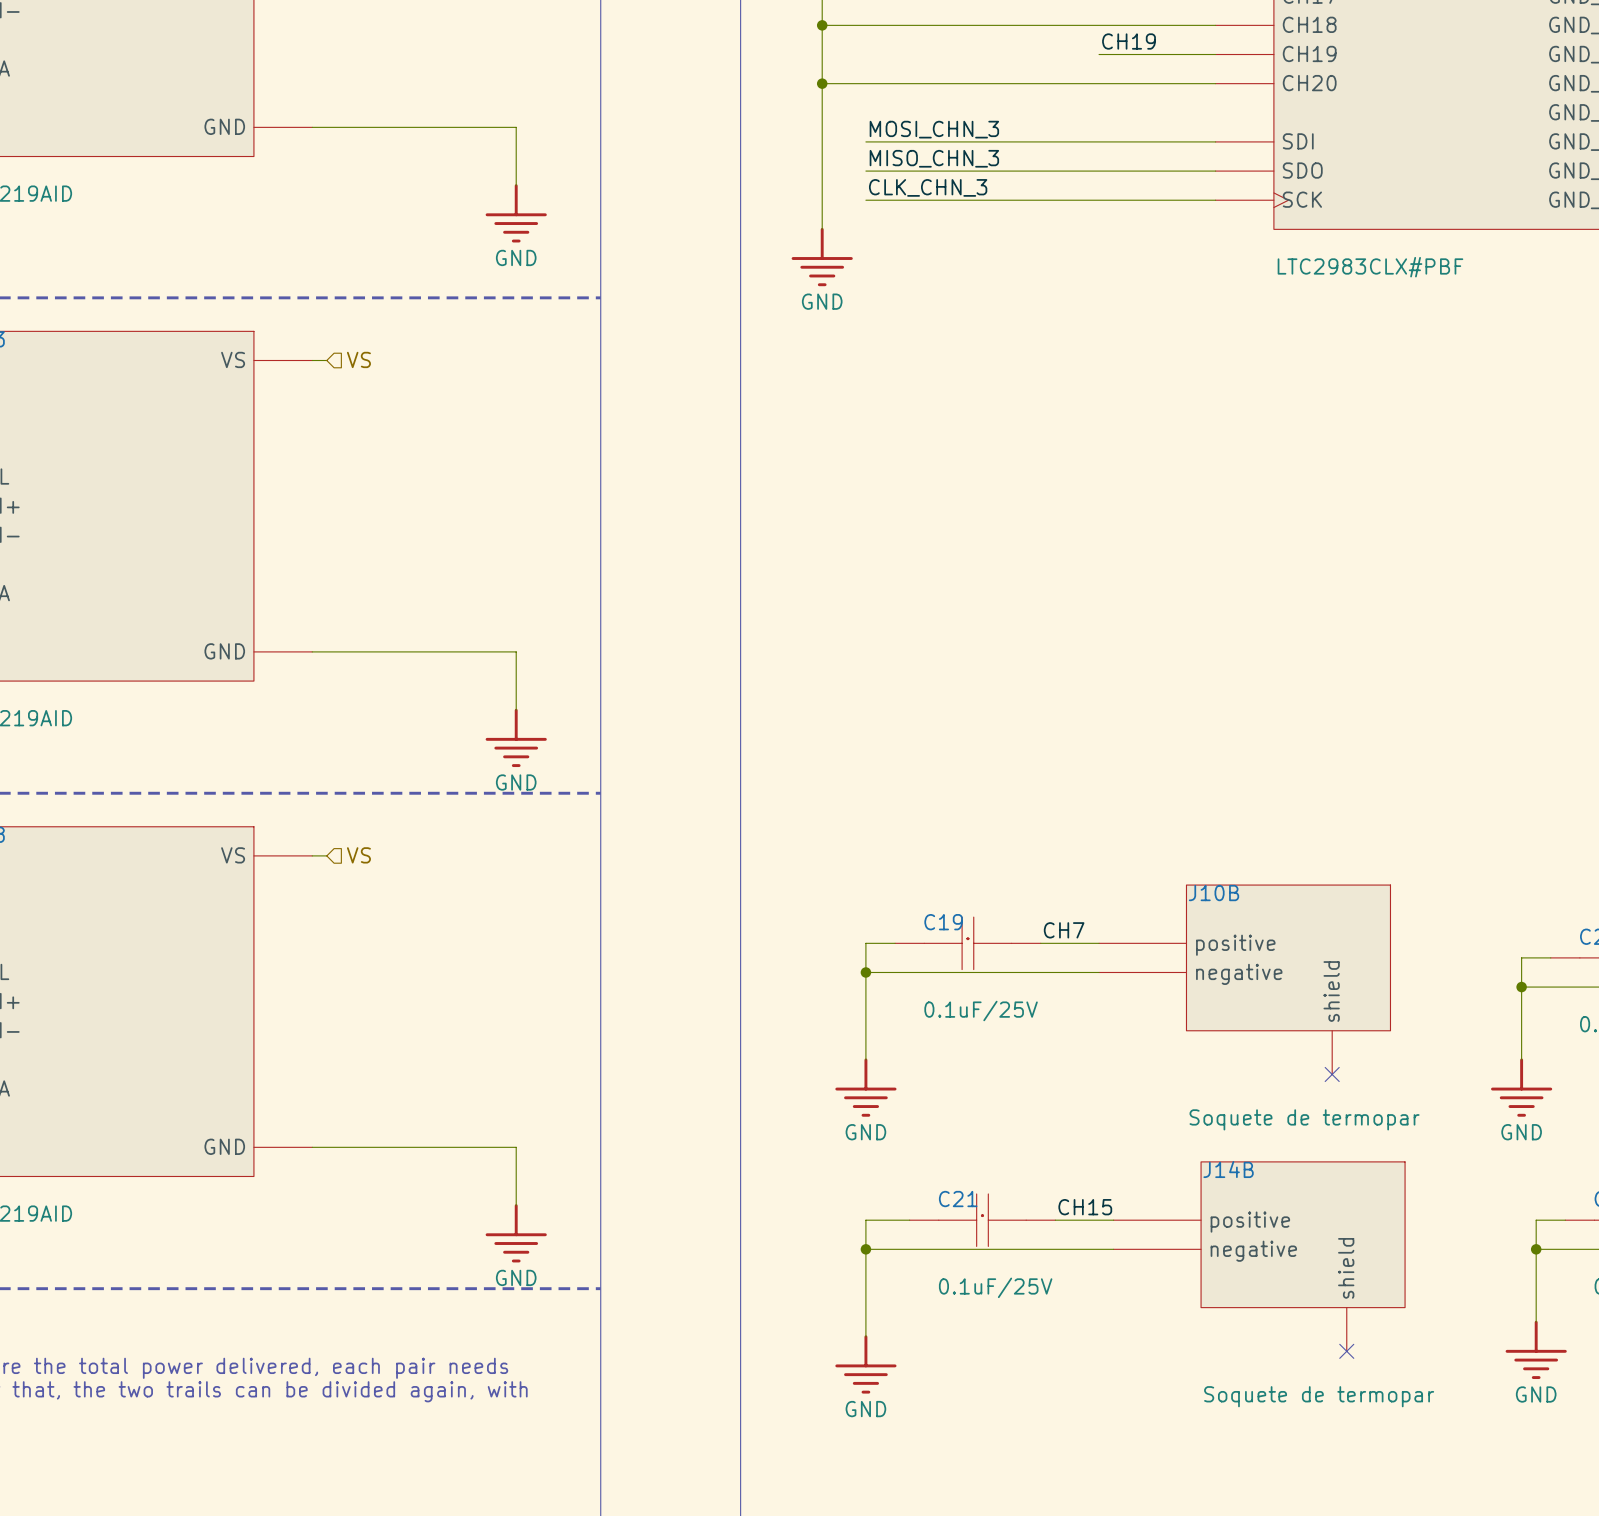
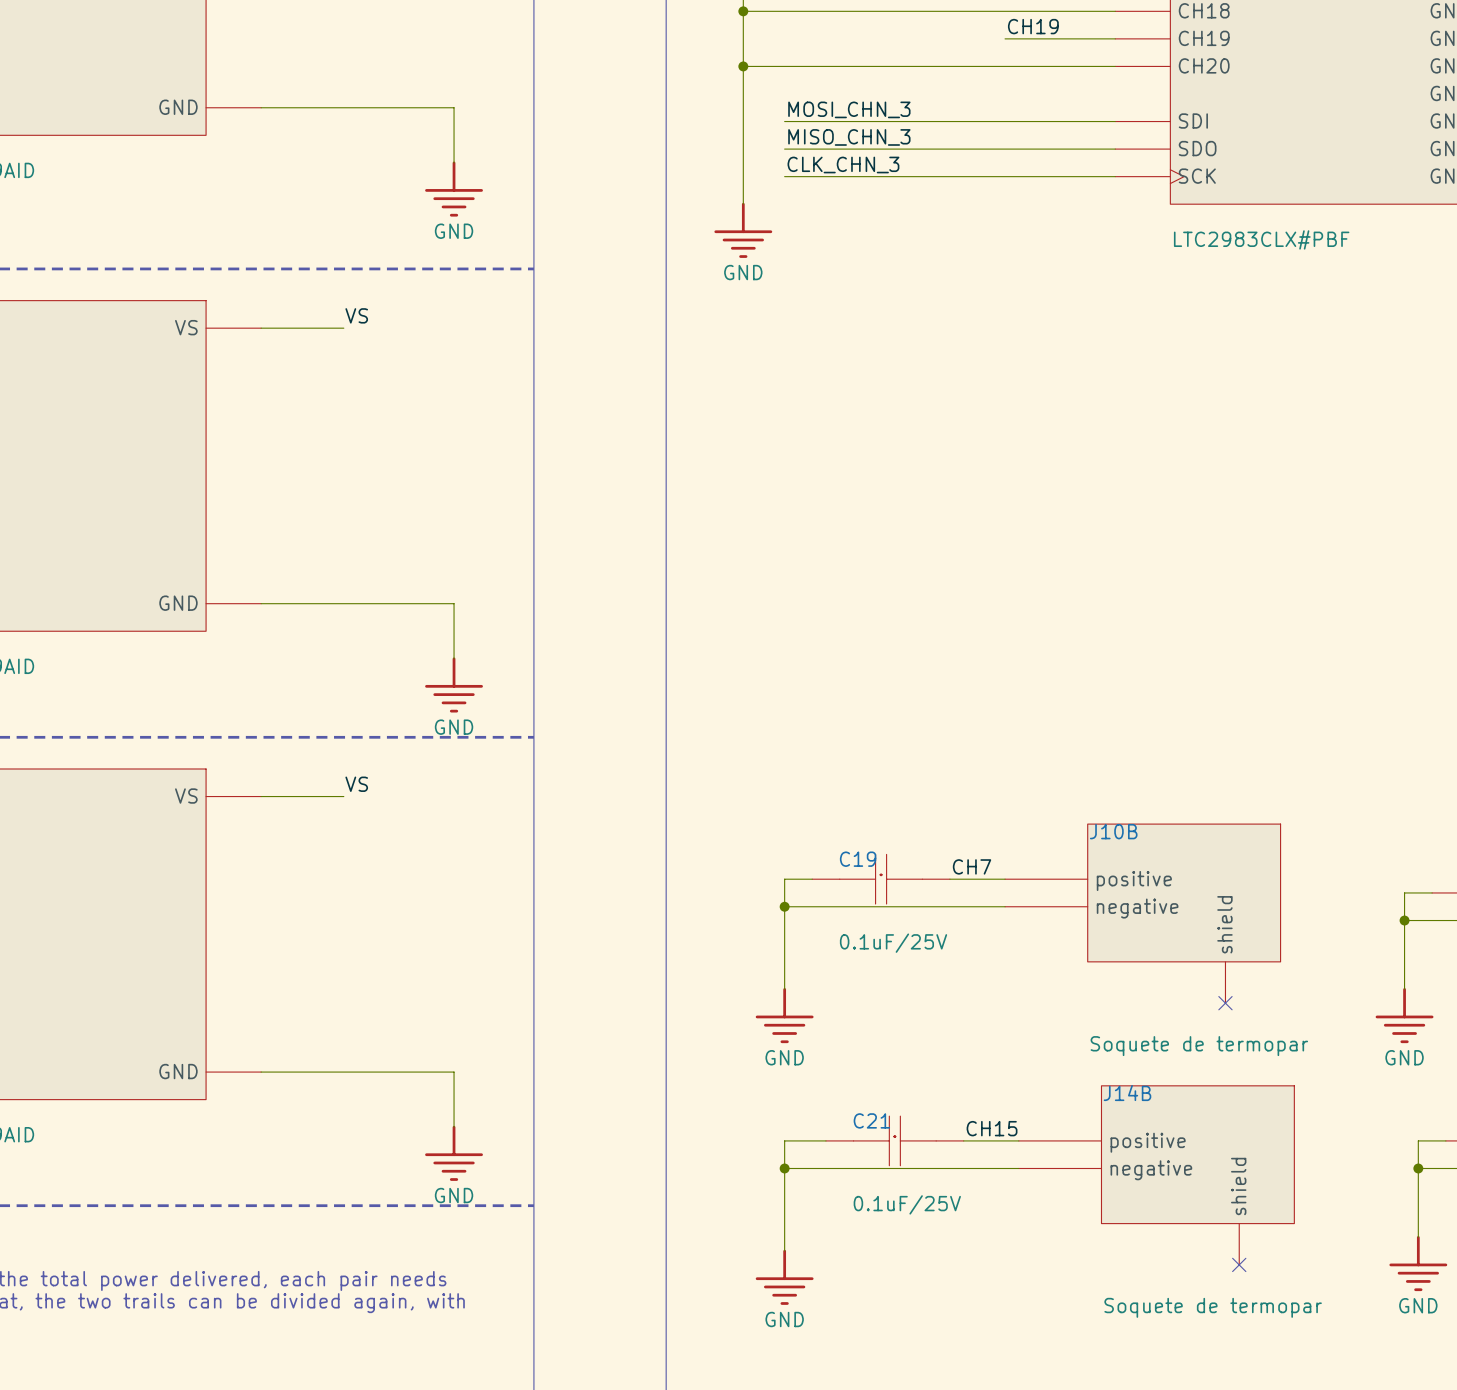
label: none -> VS (356, 315)
hierarchical label: VS (358, 359) -> none
wire: none -> (274, 328) (343, 328)
label: none -> VS (356, 784)
wire: none -> (274, 796) (343, 796)
hierarchical label: VS (358, 855) -> none

